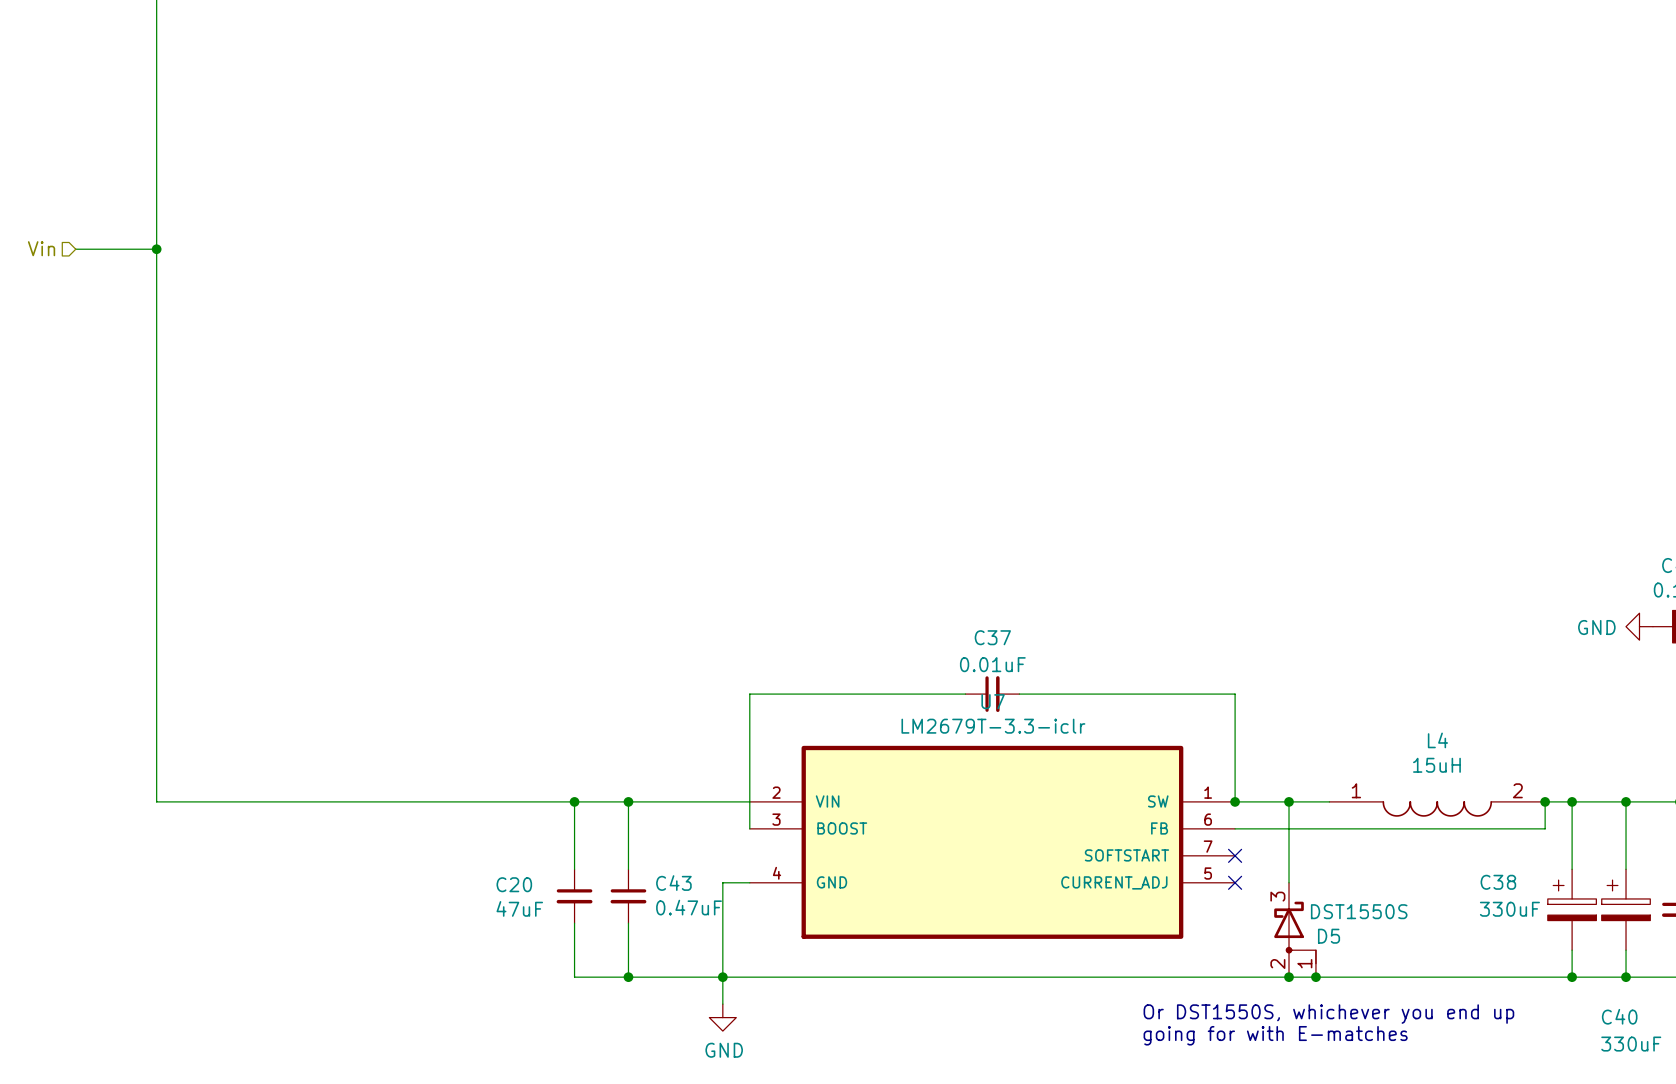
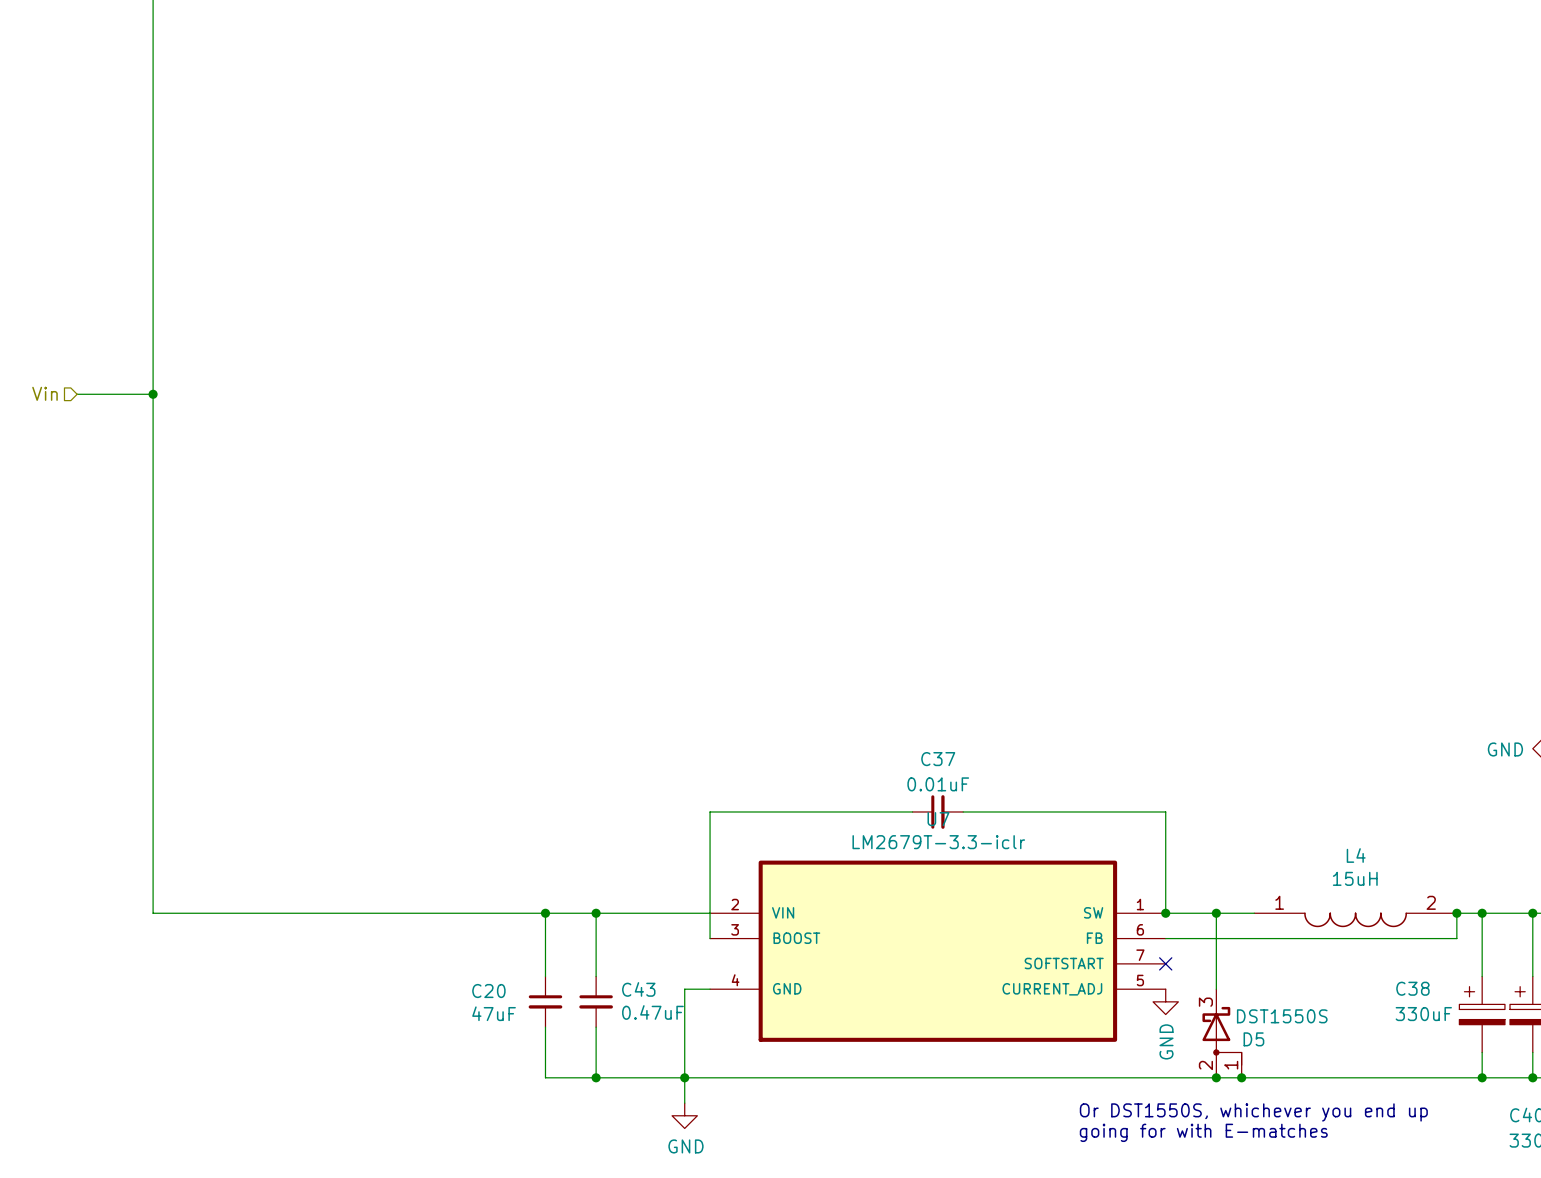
no-connect mark: (1235, 882) -> none
power symbol: none -> GND (1165, 1001)

